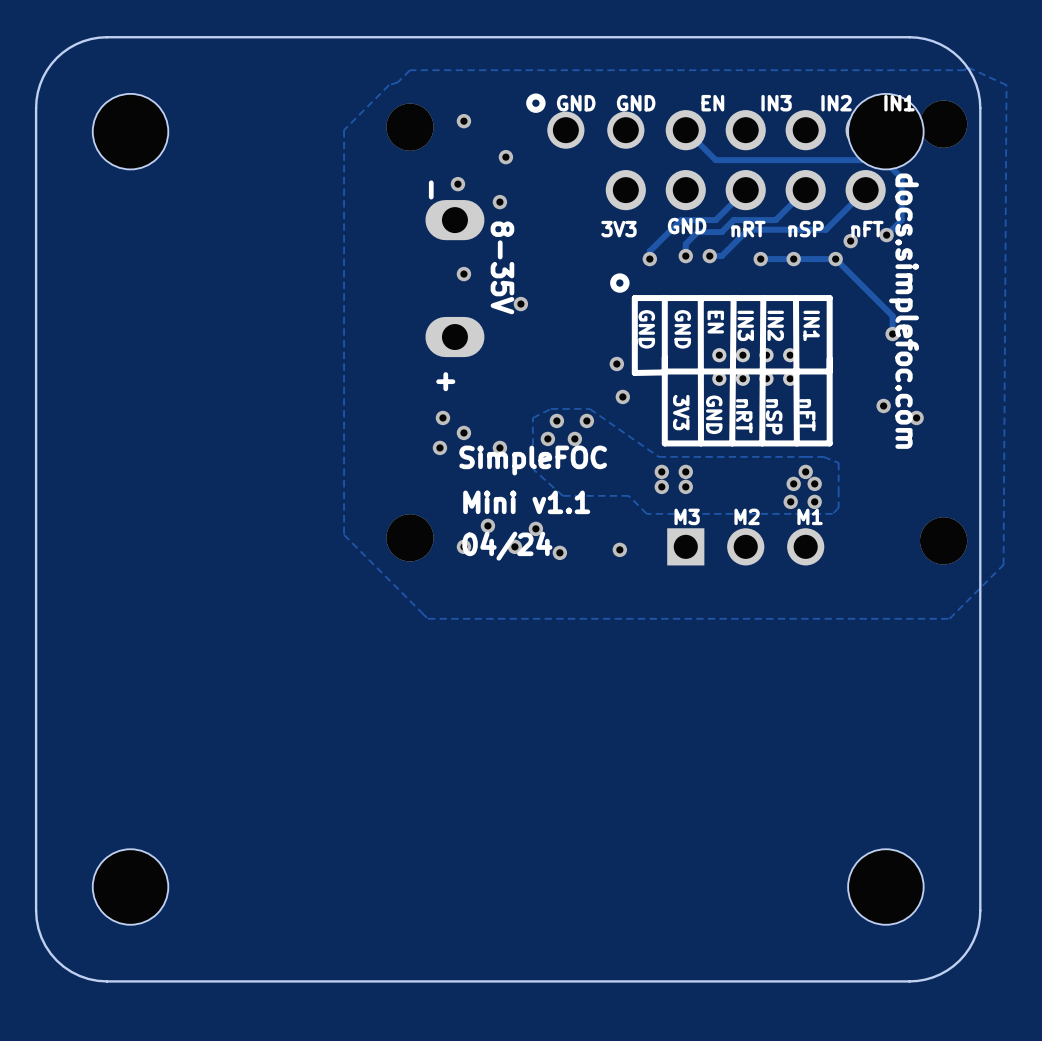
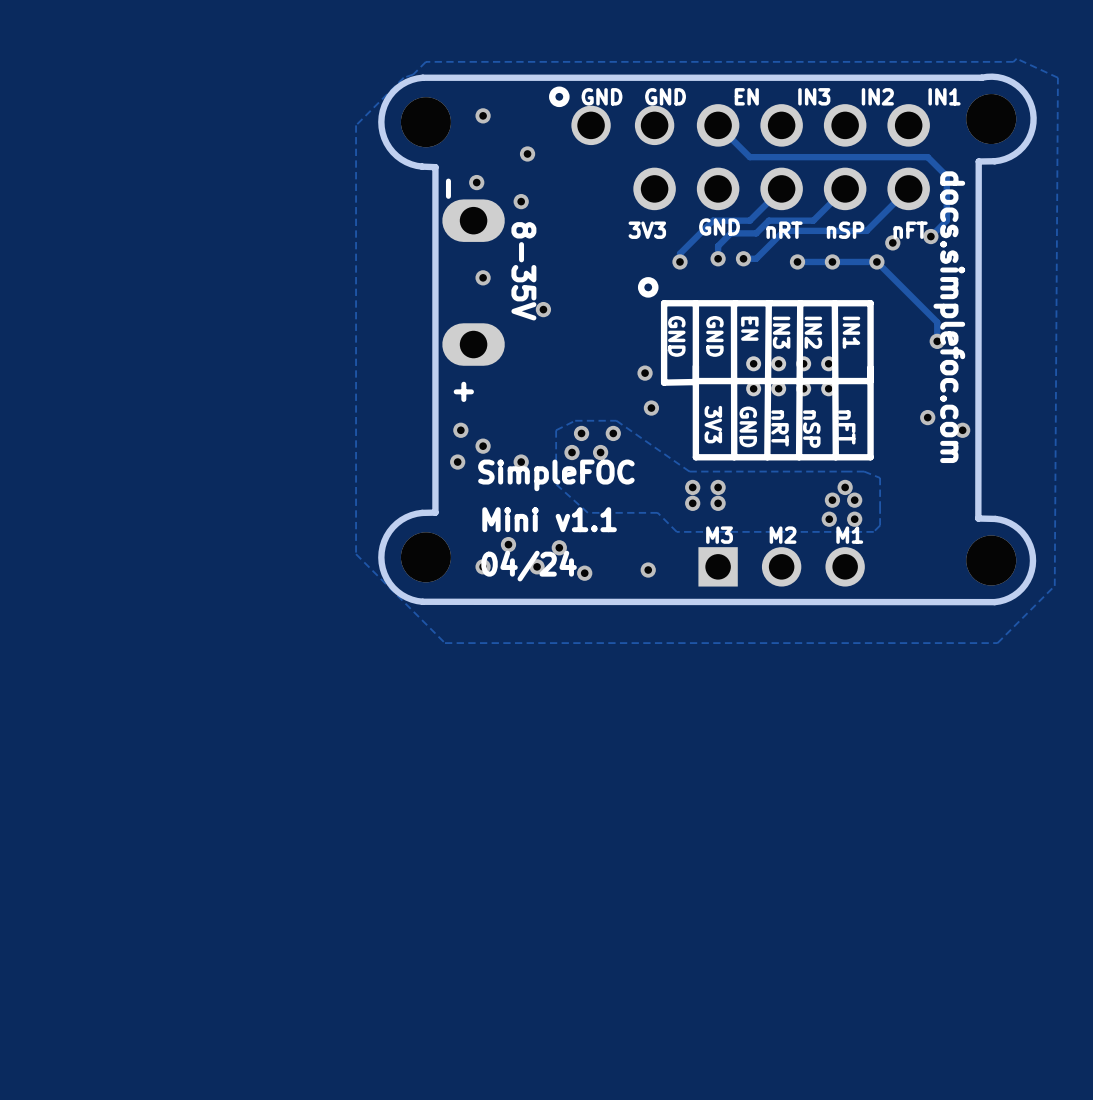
board edge: (909, 37) (106, 37) (91, 39) (76, 44) (56, 57) (46, 70) (40, 84) (36, 108) (36, 910) (41, 937) (56, 960) (79, 976) (106, 981) (909, 981) (925, 979) (940, 974) (959, 960) (969, 948) (976, 934) (980, 910) (980, 108) (976, 84) (969, 70) (959, 57) (947, 48) (932, 41) (909, 37) -> none
board edge: none -> (981, 77) (422, 77) (411, 79) (397, 87) (386, 100) (381, 116) (381, 127) (386, 143) (397, 156) (406, 162) (416, 165) (435, 167) (435, 512) (416, 513) (406, 517) (397, 523) (386, 536) (382, 546) (381, 563) (384, 573) (393, 587) (406, 597) (422, 601) (994, 602) (1009, 598) (1018, 592) (1025, 584) (1031, 571) (1032, 555) (1028, 541) (1022, 532) (1010, 523) (995, 518) (978, 518) (978, 161) (1000, 160) (1019, 151) (1028, 138) (1033, 117) (1027, 97) (1017, 85) (997, 77) (981, 77)
part: (130, 131) -> none
part: (885, 131) -> none
part: (130, 887) -> none
part: (885, 887) -> none

